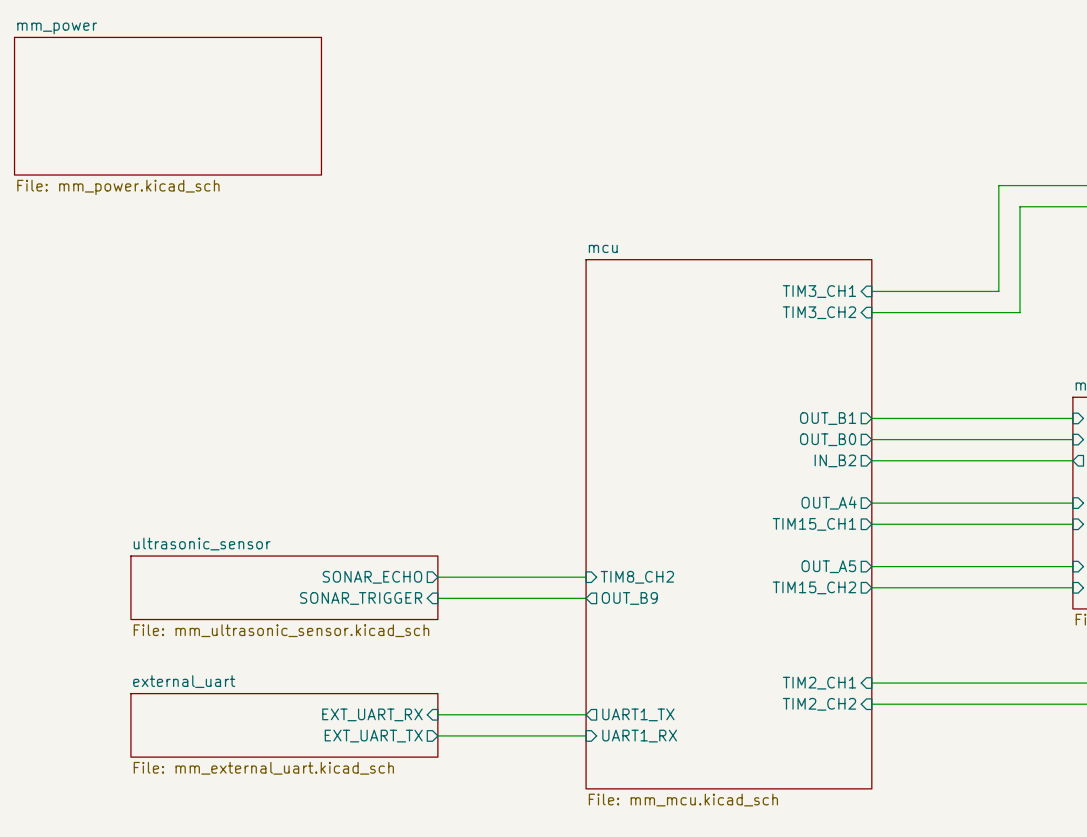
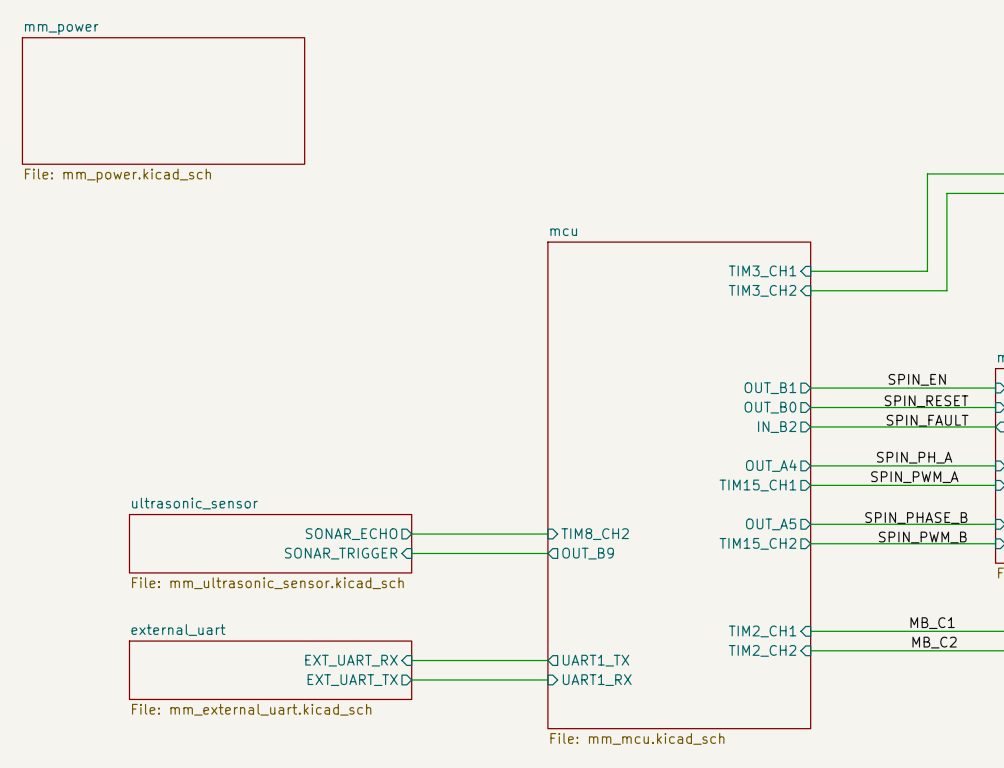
label: none -> SPIN_EN (917, 379)
label: none -> SPIN_RESET (926, 401)
label: none -> SPIN_FAULT (927, 420)
label: none -> SPIN_PH_A (914, 457)
label: none -> SPIN_PWM_A (914, 477)
label: none -> SPIN_PHASE_B (916, 518)
label: none -> SPIN_PWM_B (922, 537)
label: none -> MB_C1 (932, 623)
label: none -> MB_C2 (934, 642)

